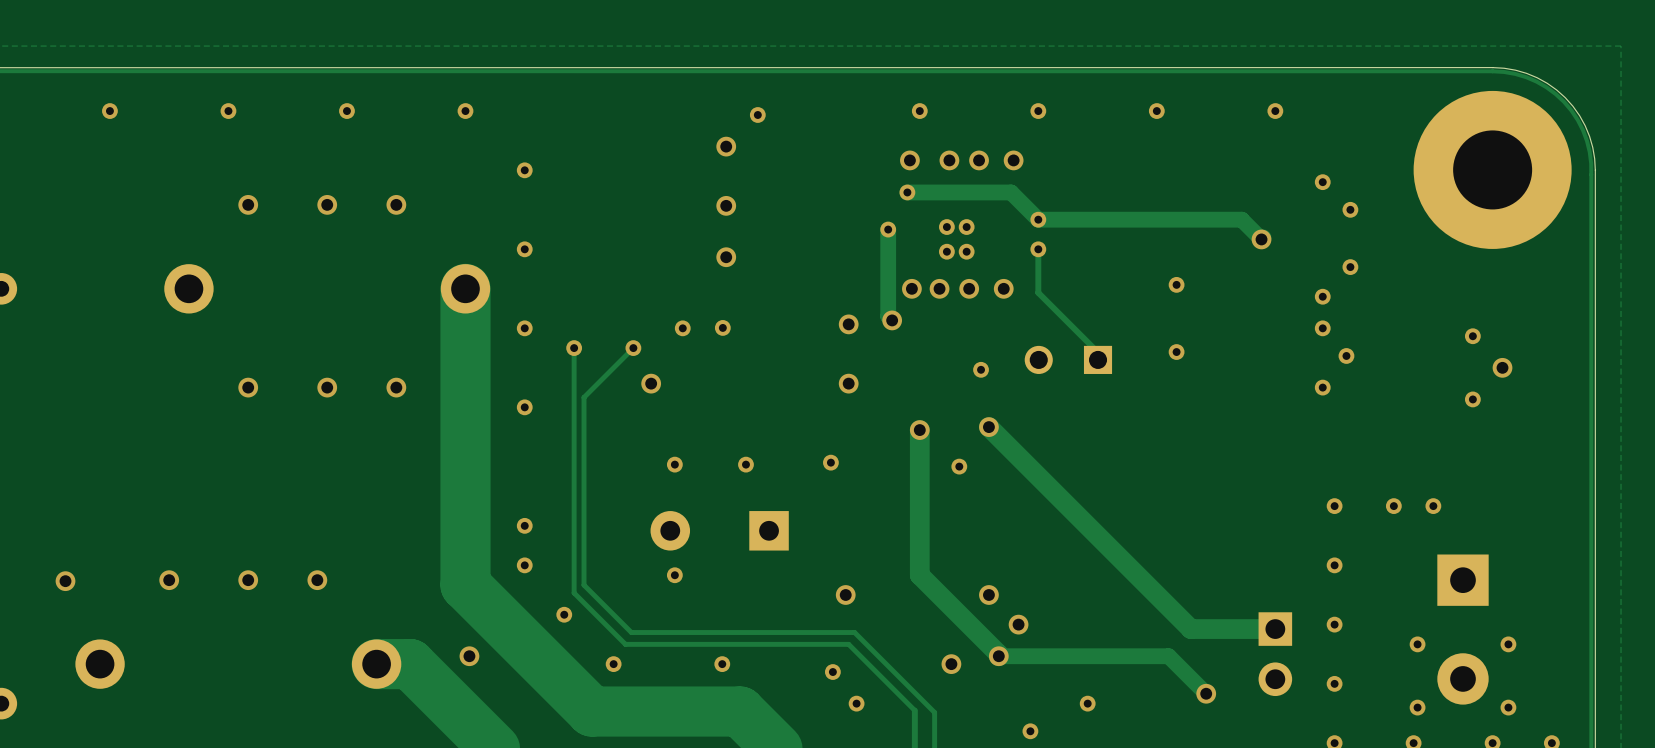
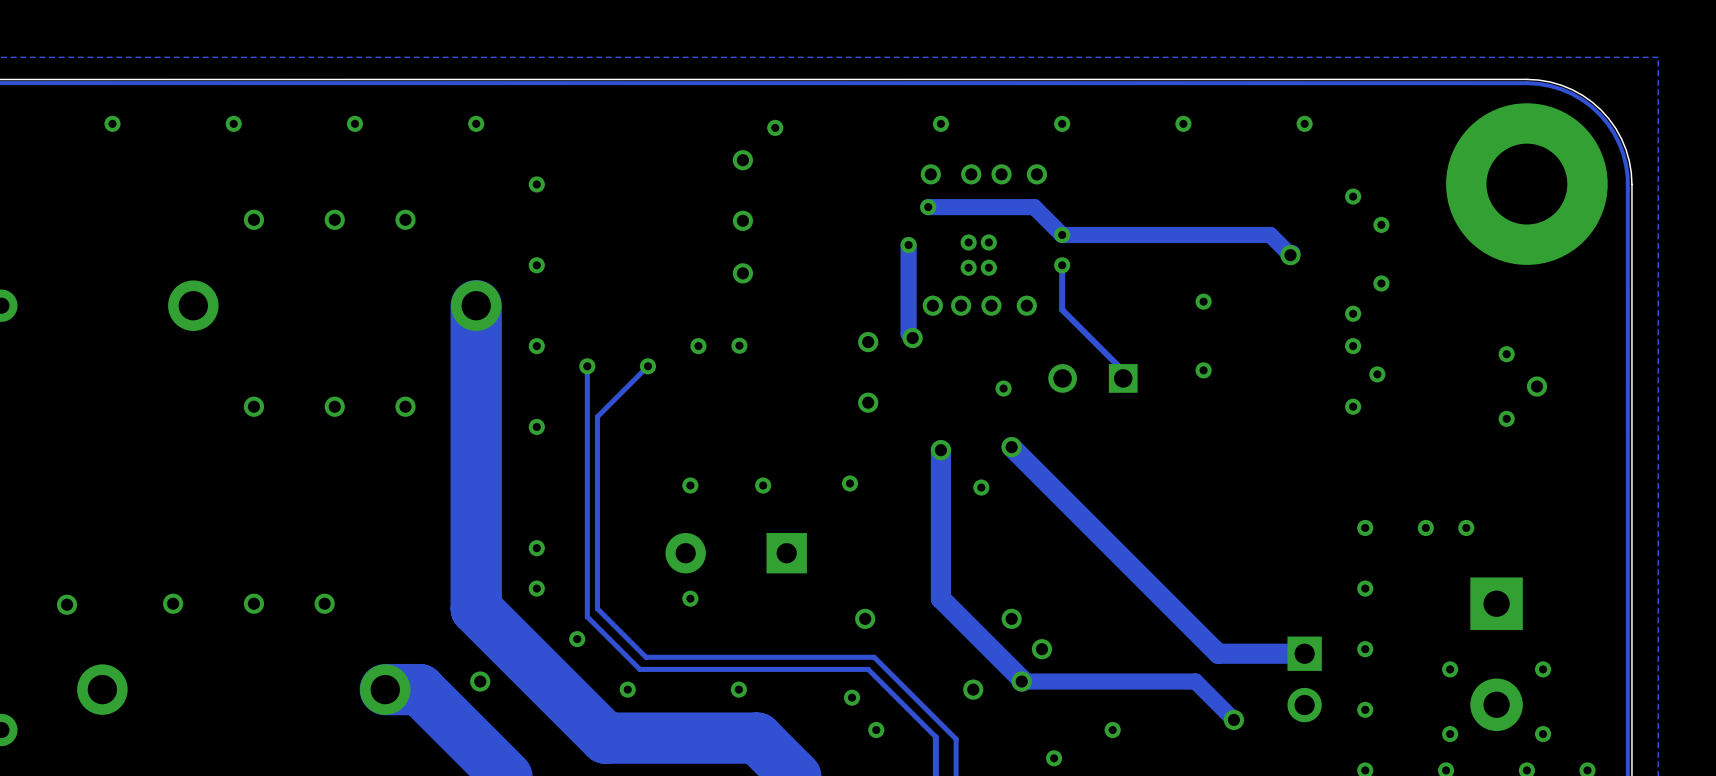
via: (651, 383) -> none

